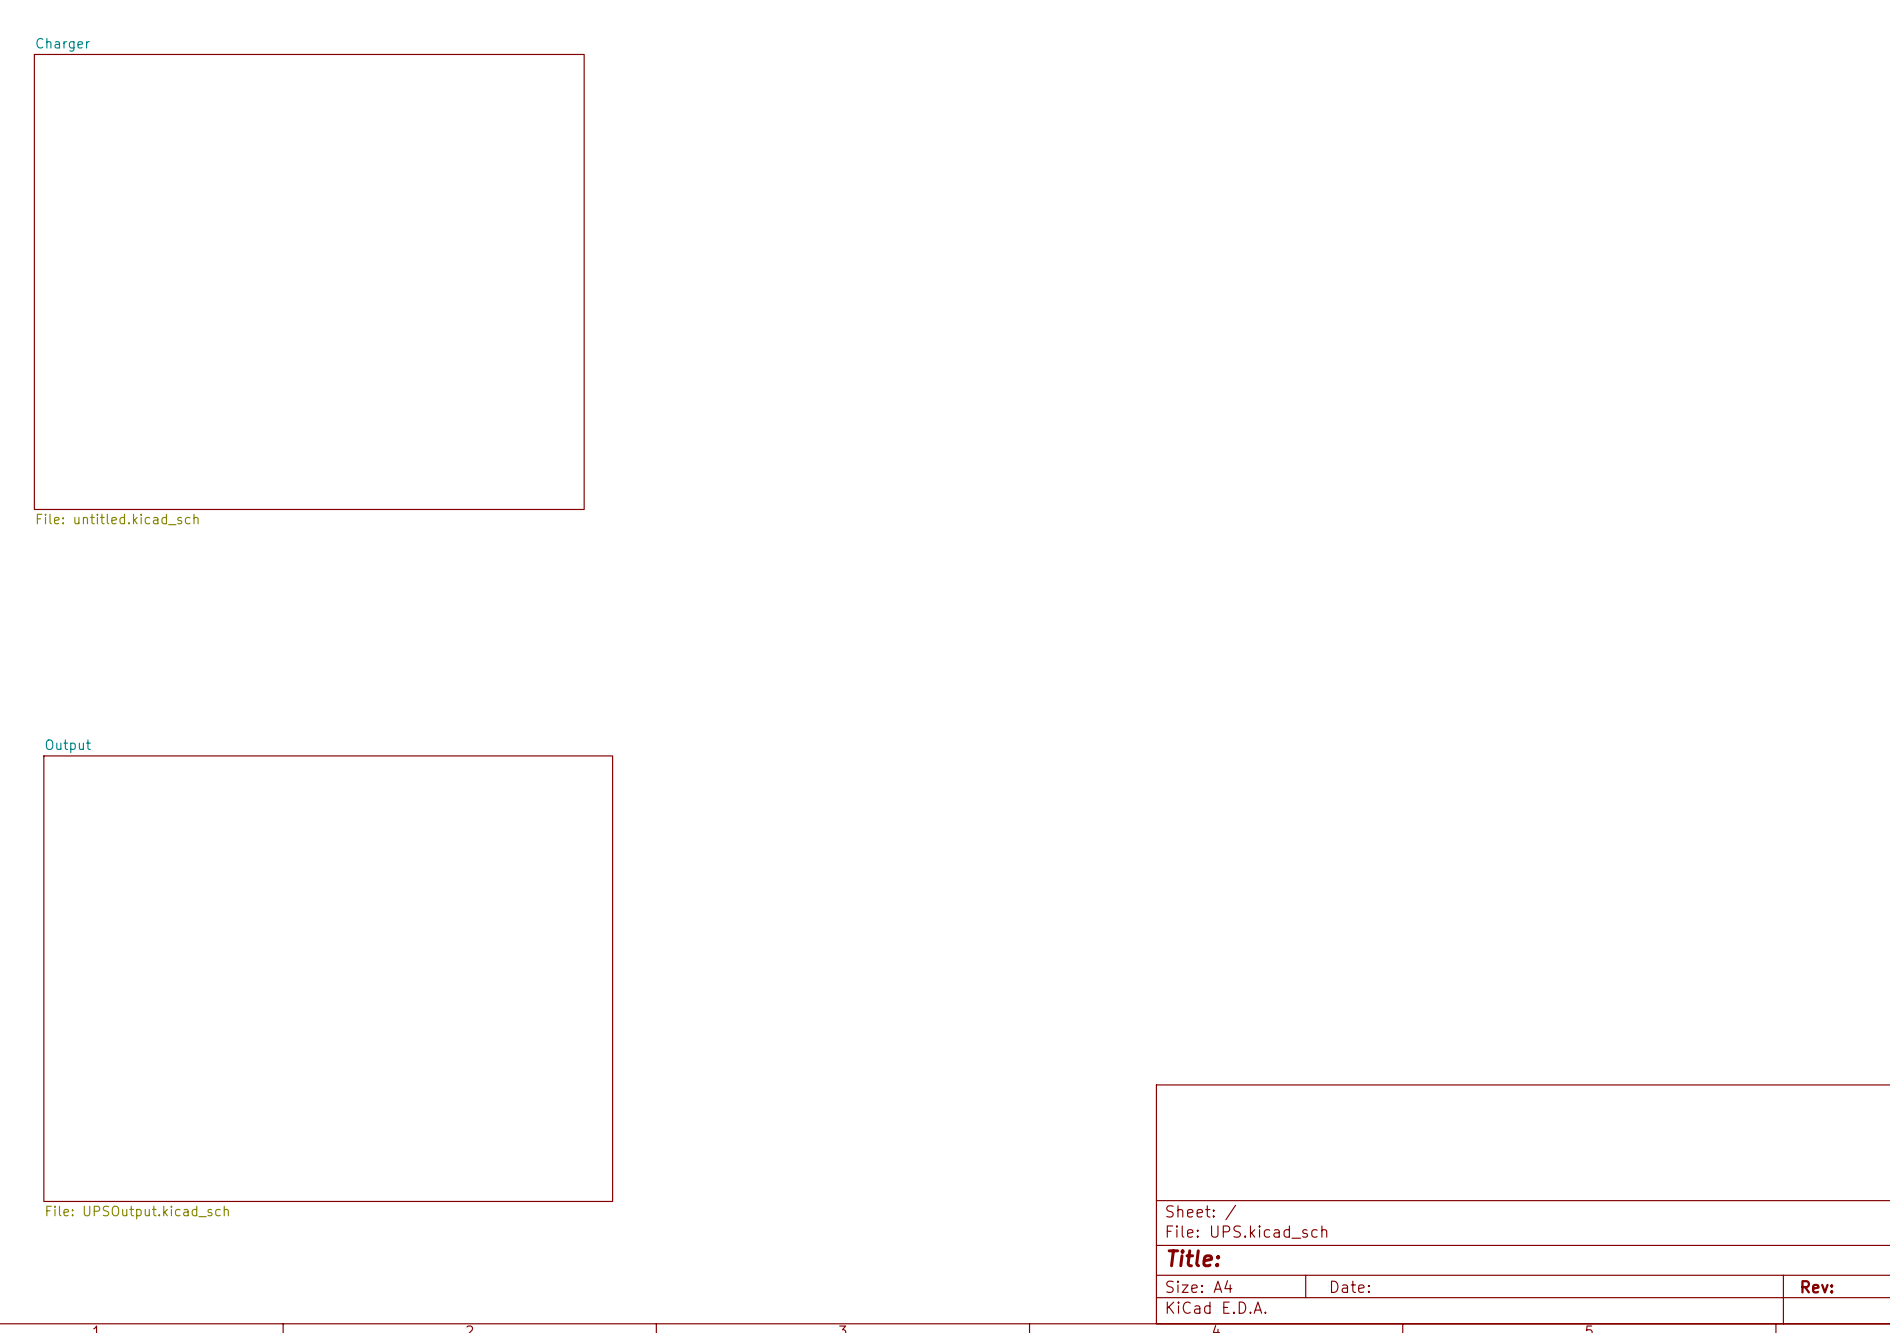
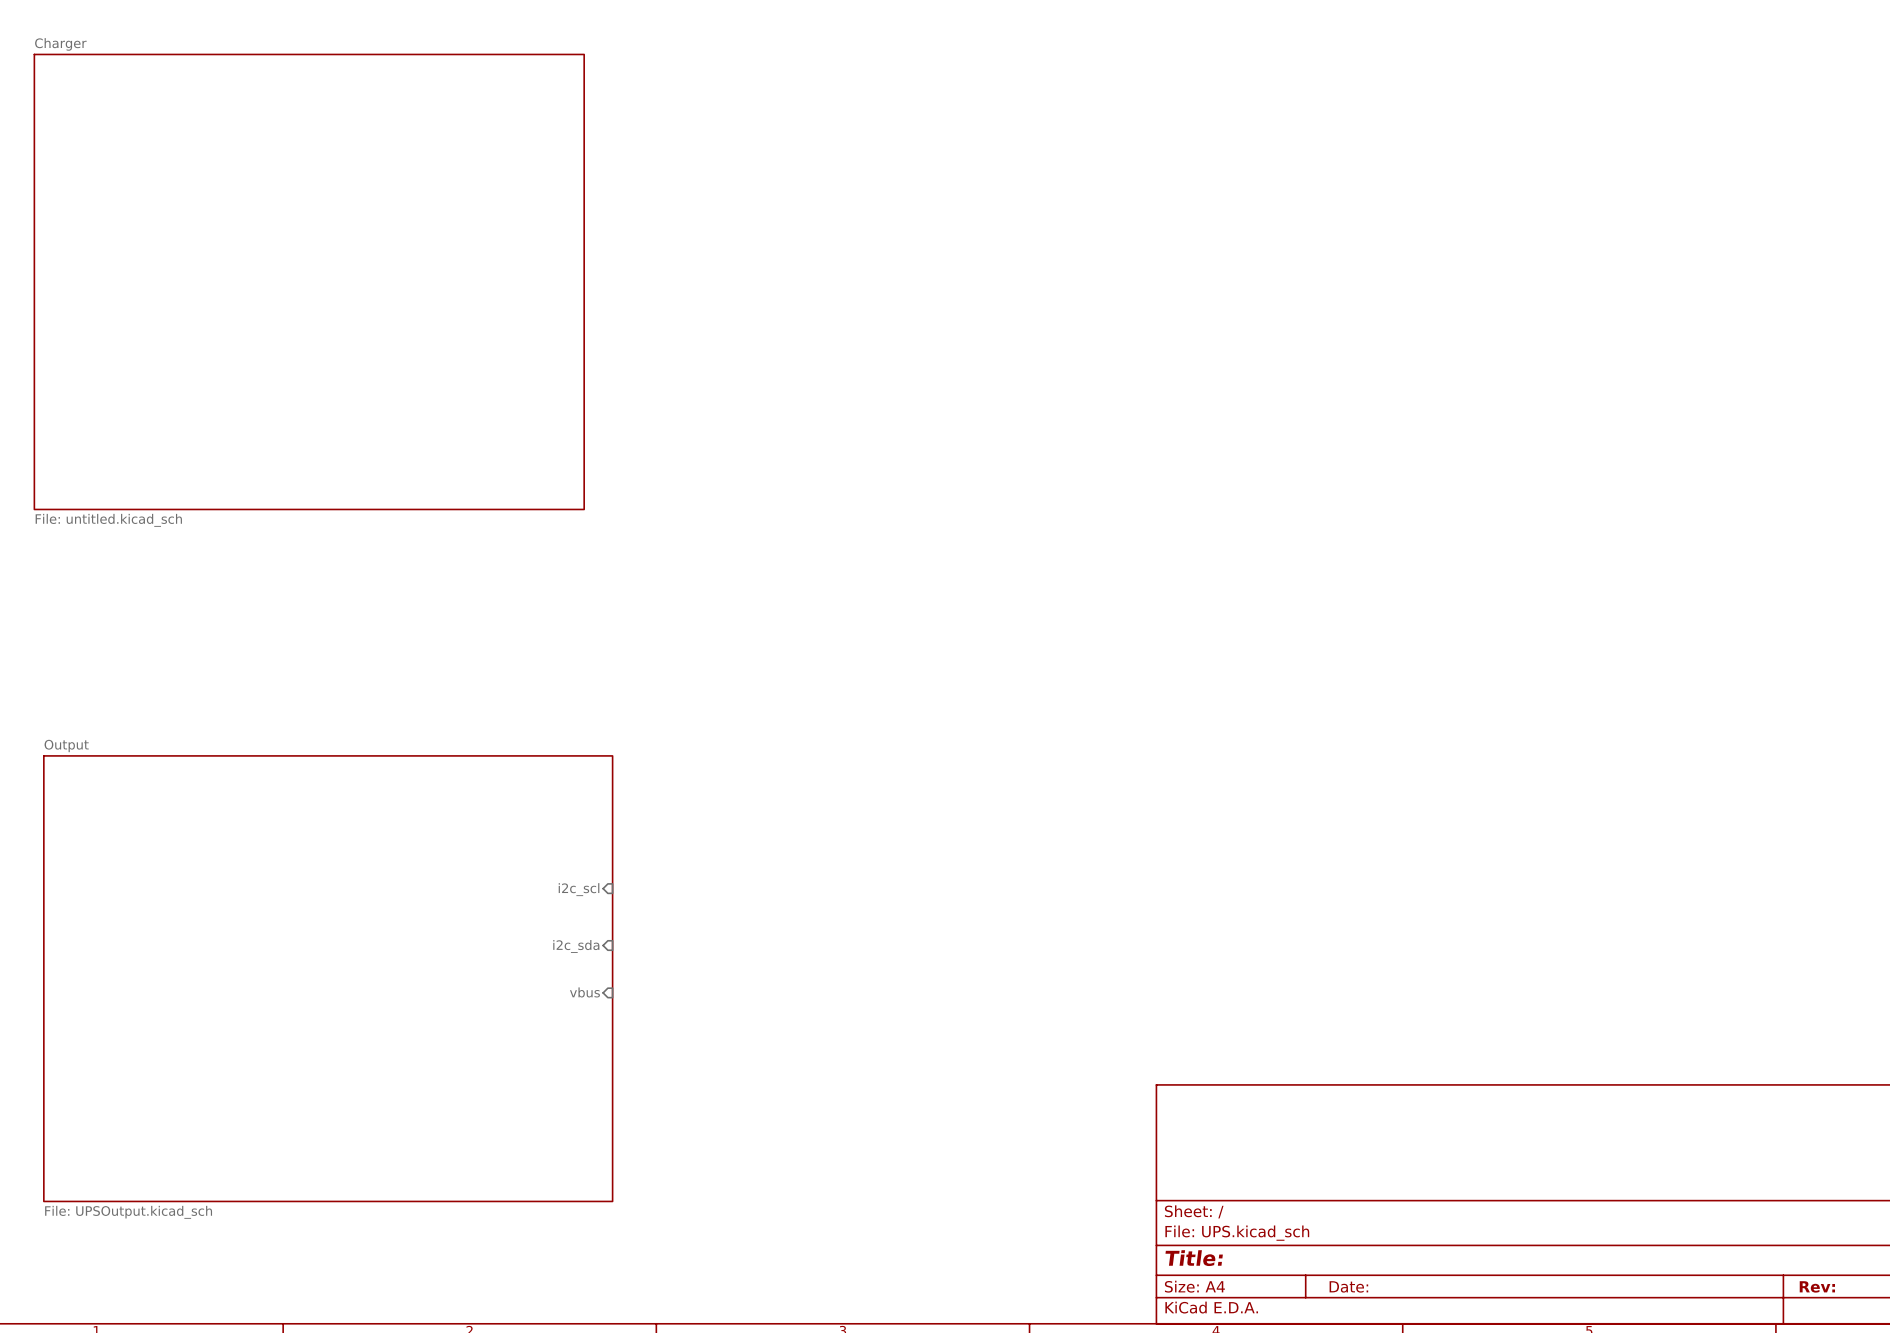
sheet pin: none -> i2c_scl (579, 889)
sheet pin: none -> i2c_sda (576, 946)
sheet pin: none -> vbus (584, 992)

